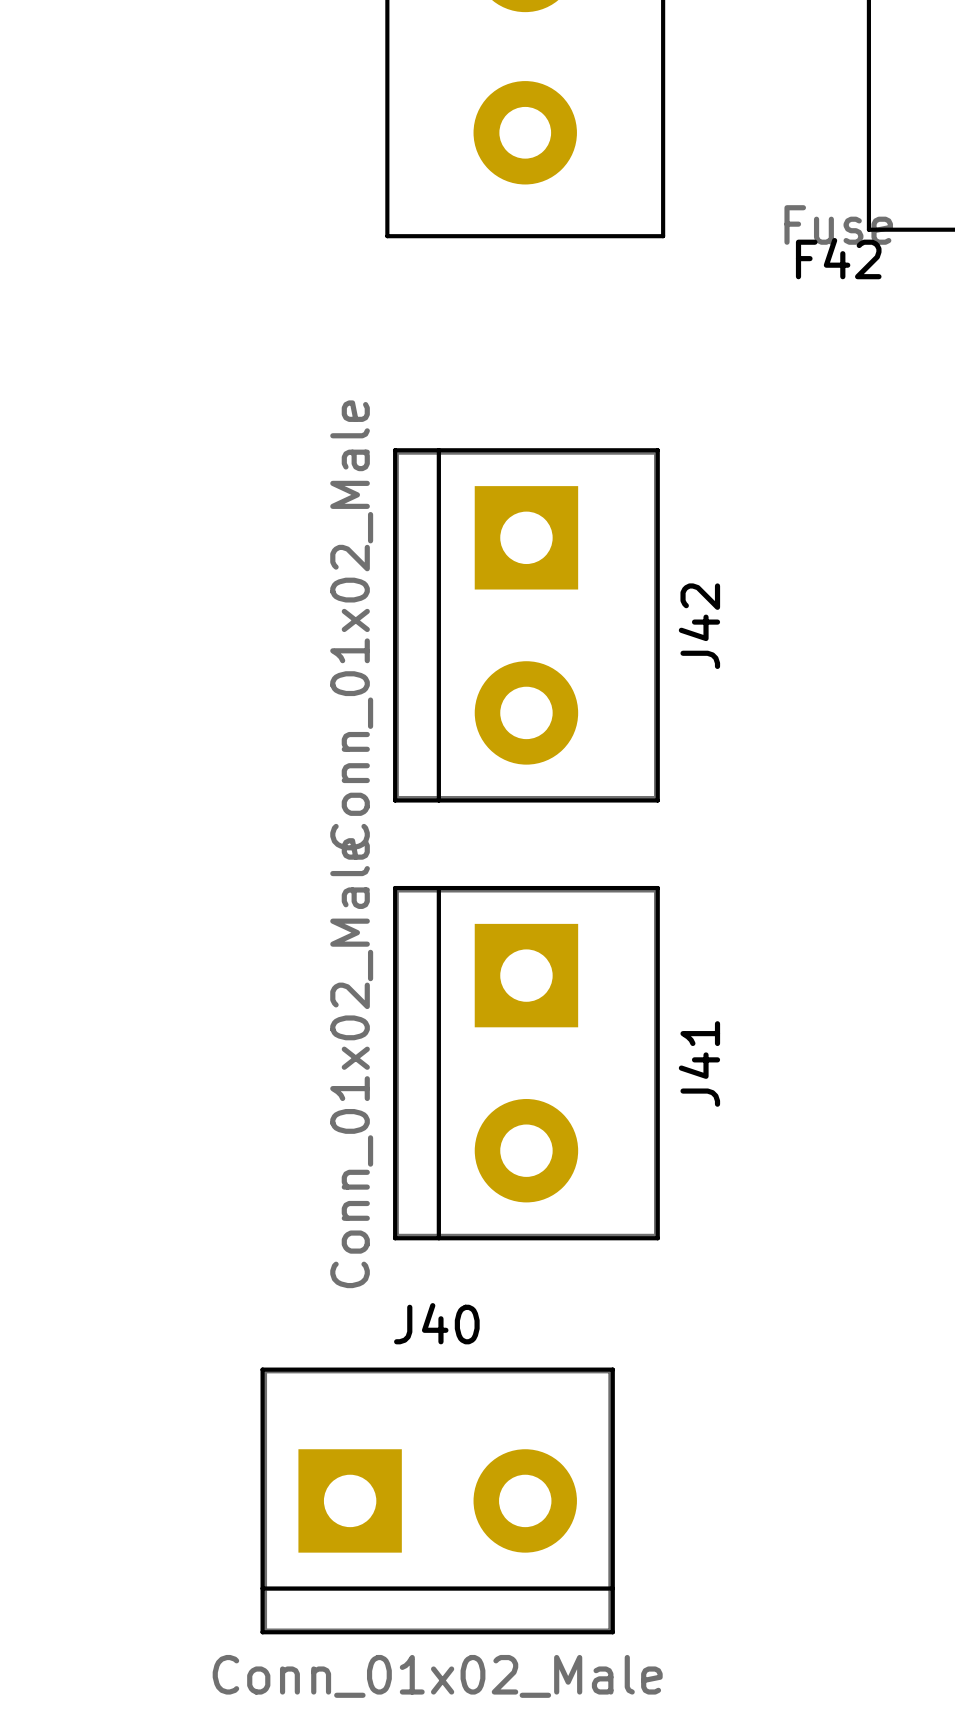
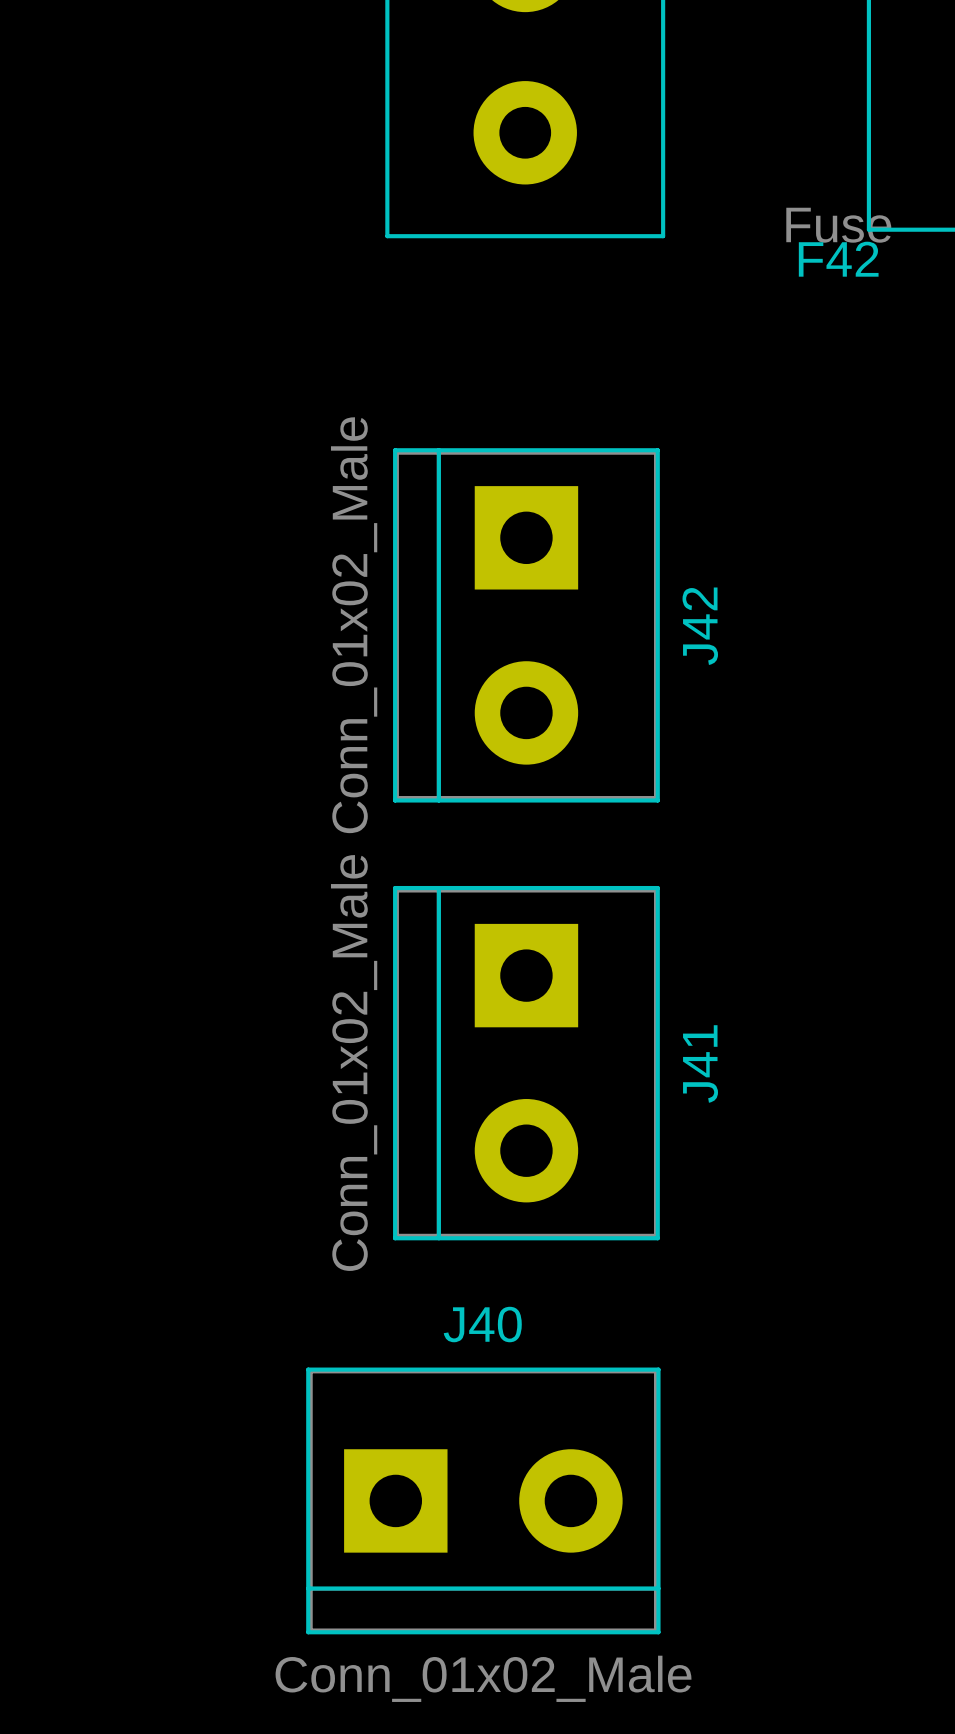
J40 position: (437, 1500) -> (483, 1500)

